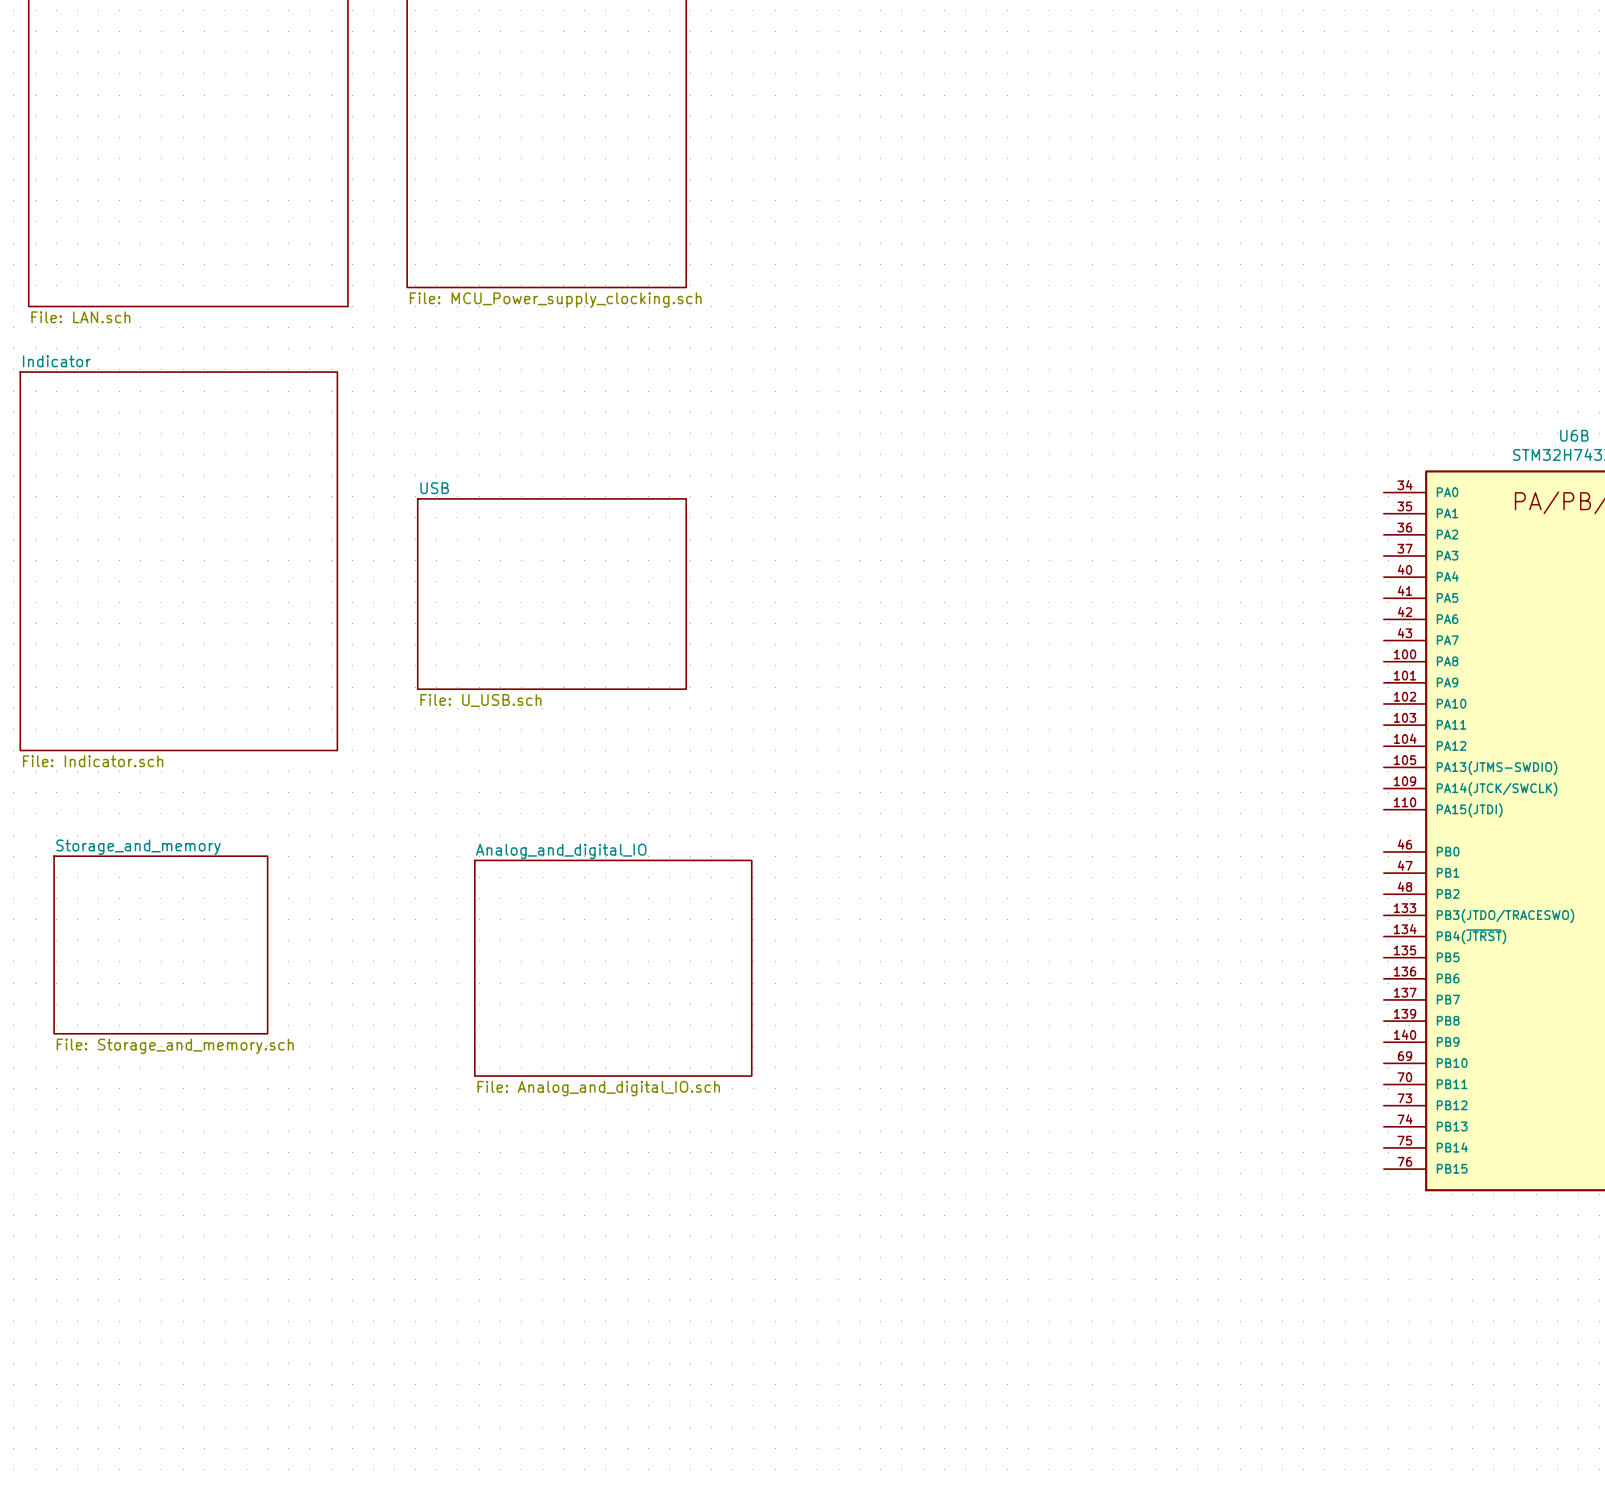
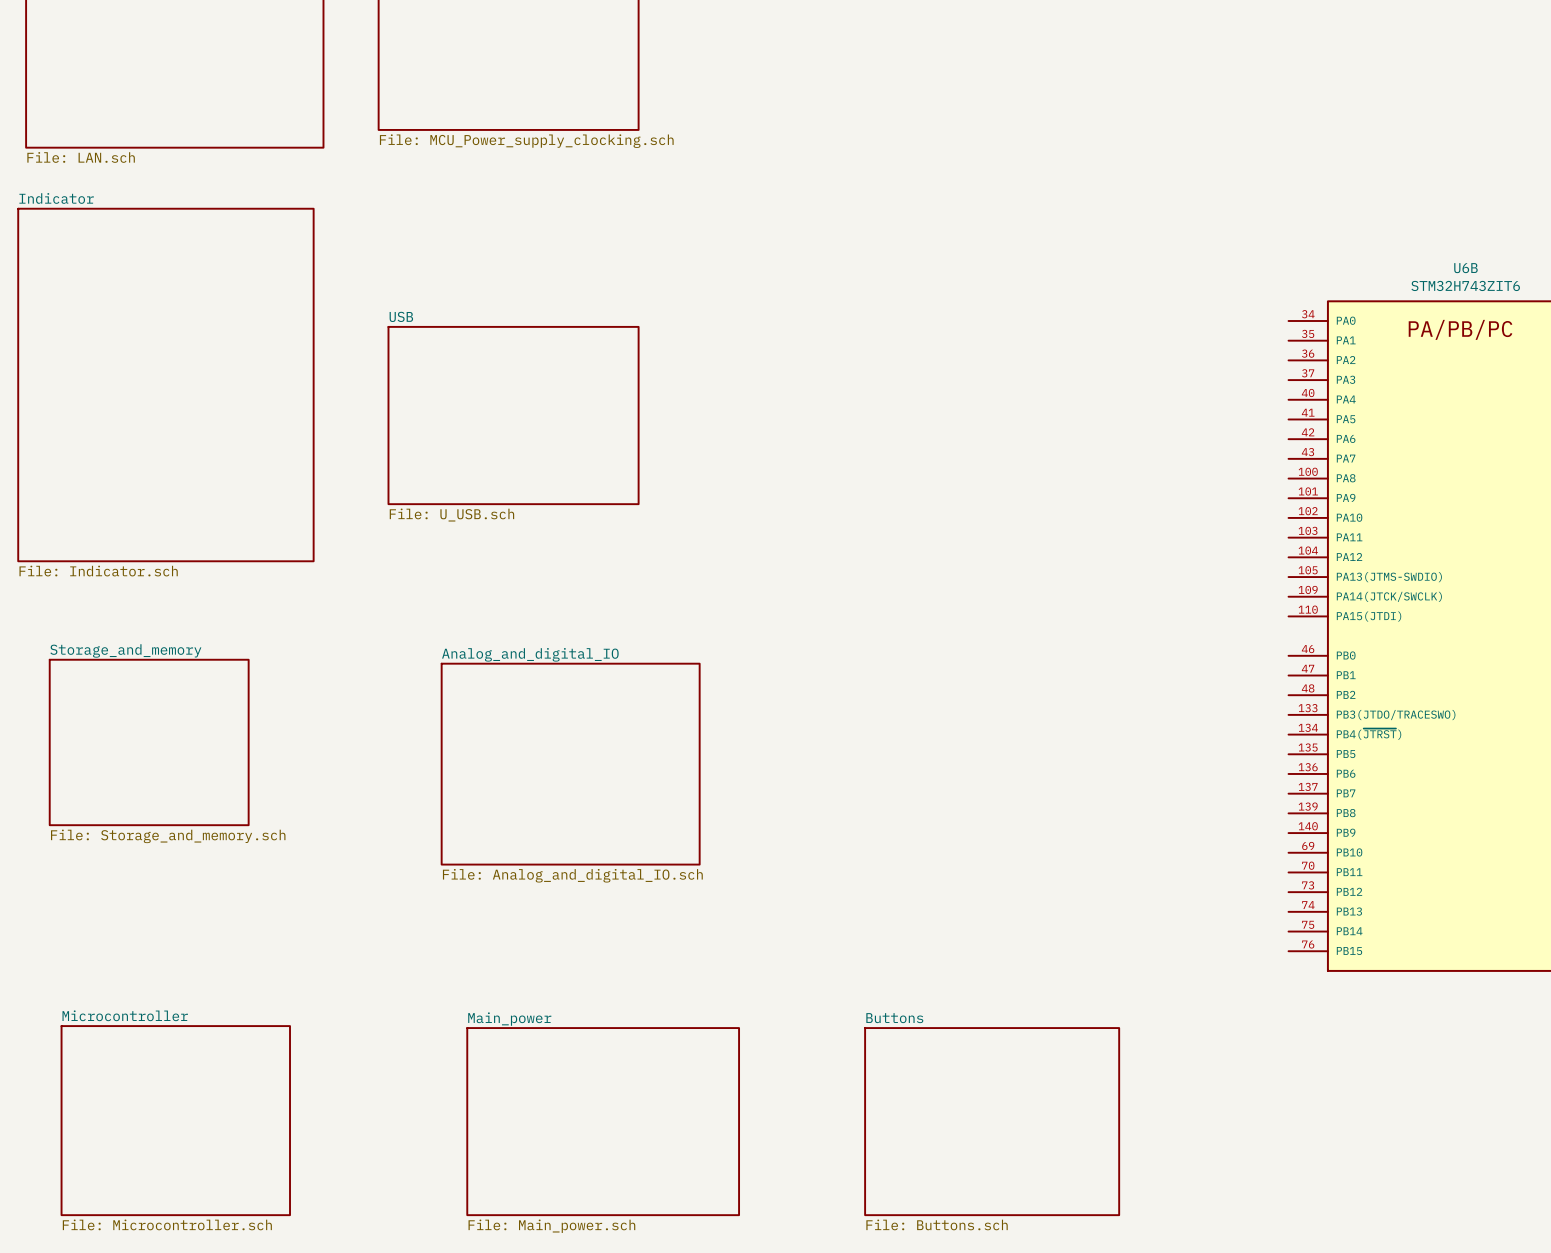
sheet Microcontroller: none -> File: Microcontroller.sch (175, 1120)
sheet Main_power: none -> File: Main_power.sch (603, 1121)
sheet Buttons: none -> File: Buttons.sch (992, 1121)

